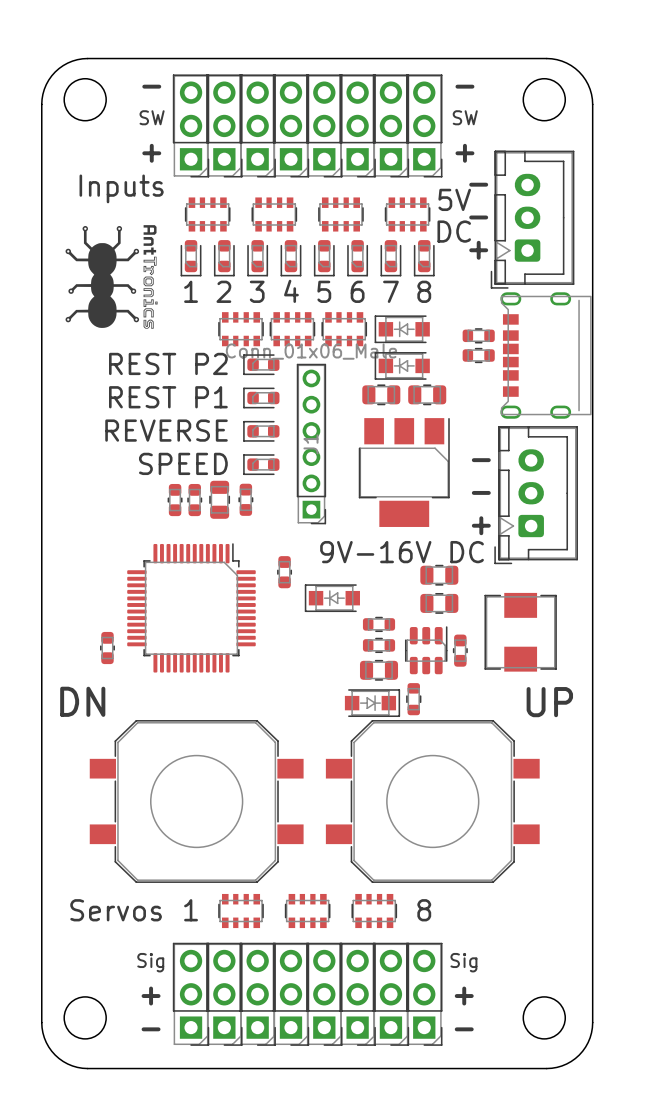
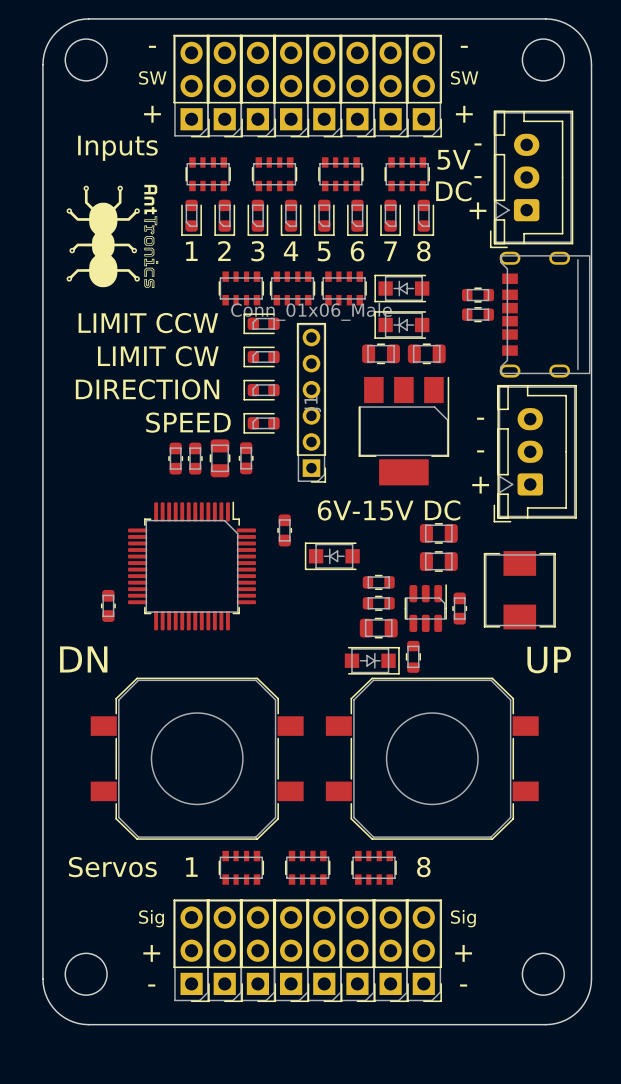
text: none -> LIMIT CCW (148, 323)
text: REST P2 (168, 363) -> none
text: none -> LIMIT CW (158, 356)
text: REST P1 (168, 397) -> none
text: none -> DIRECTION (147, 389)
text: REVERSE (166, 430) -> none
text: 9V-16V DC (402, 552) -> 6V-15V DC (389, 510)

